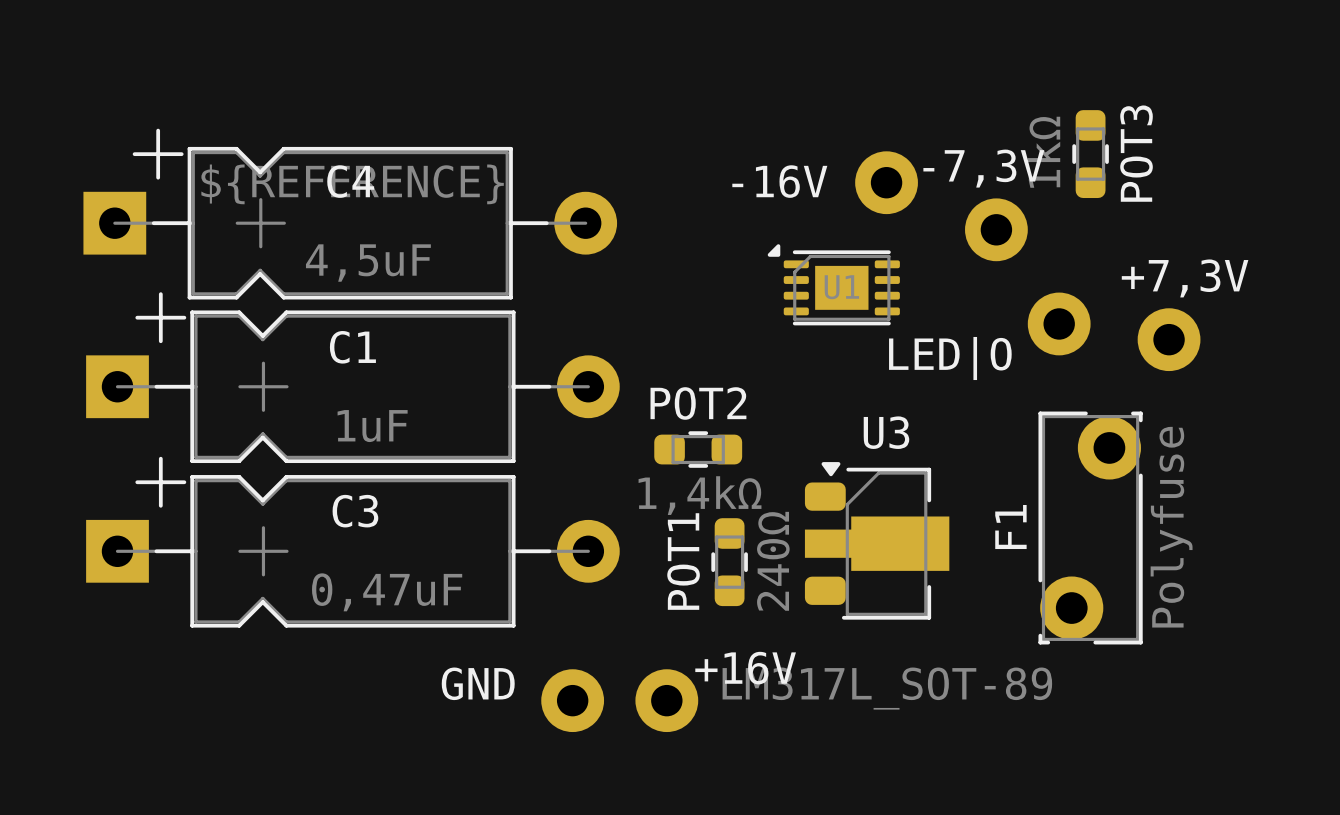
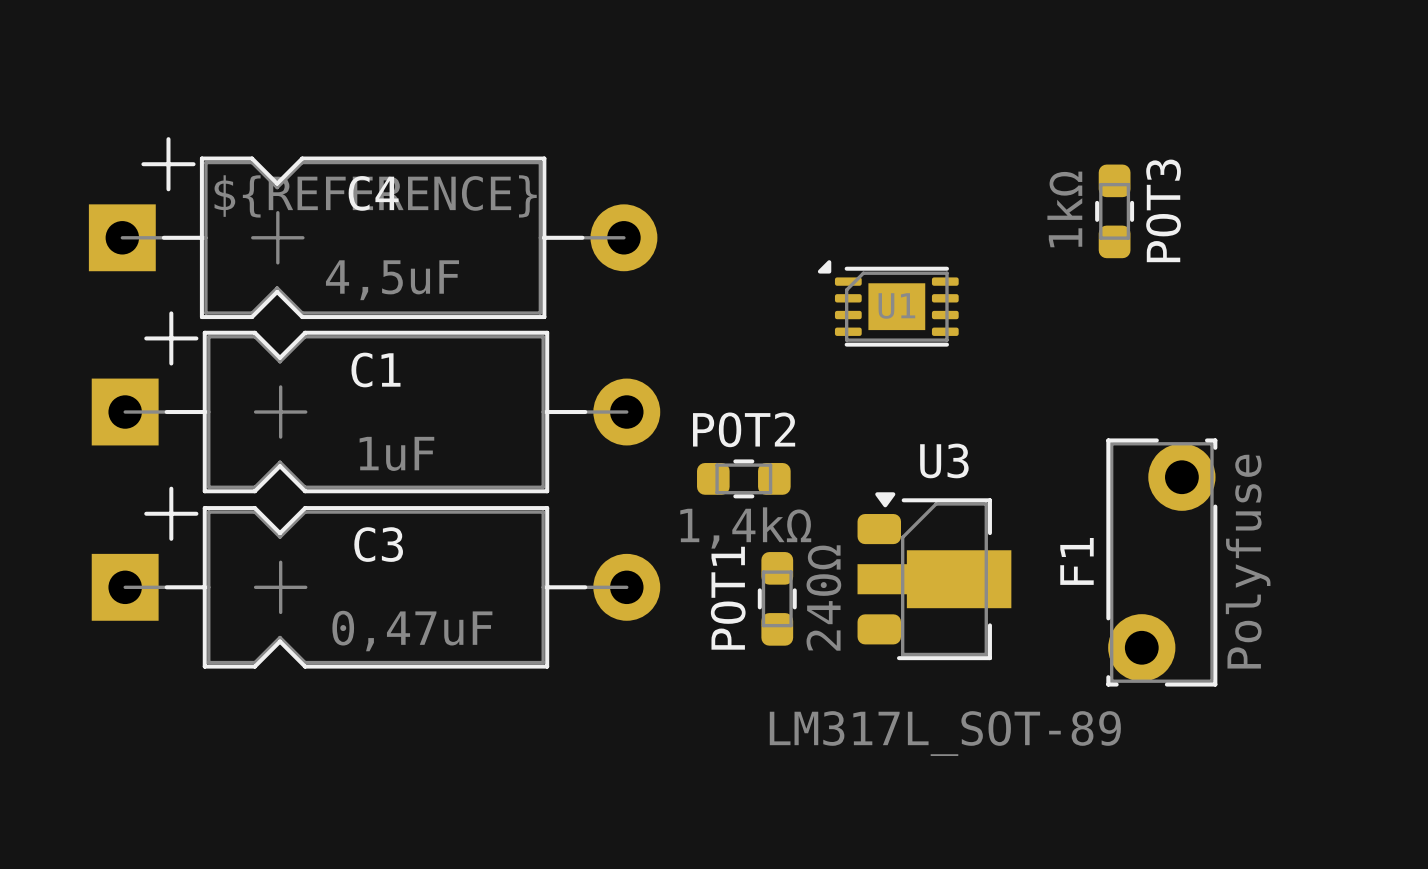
POT3 position: (1090, 154) -> (1114, 211)
text: -7,3V (983, 168) -> none
text: -16V (779, 181) -> none
part: (886, 182) -> none
part: (996, 229) -> none
text: +7,3V (1185, 278) -> none
part: (1059, 323) -> none
part: (1169, 339) -> none
text: LED|O (950, 358) -> none
text: +16V (745, 668) -> none
text: GND (478, 683) -> none
part: (572, 700) -> none
part: (666, 700) -> none

